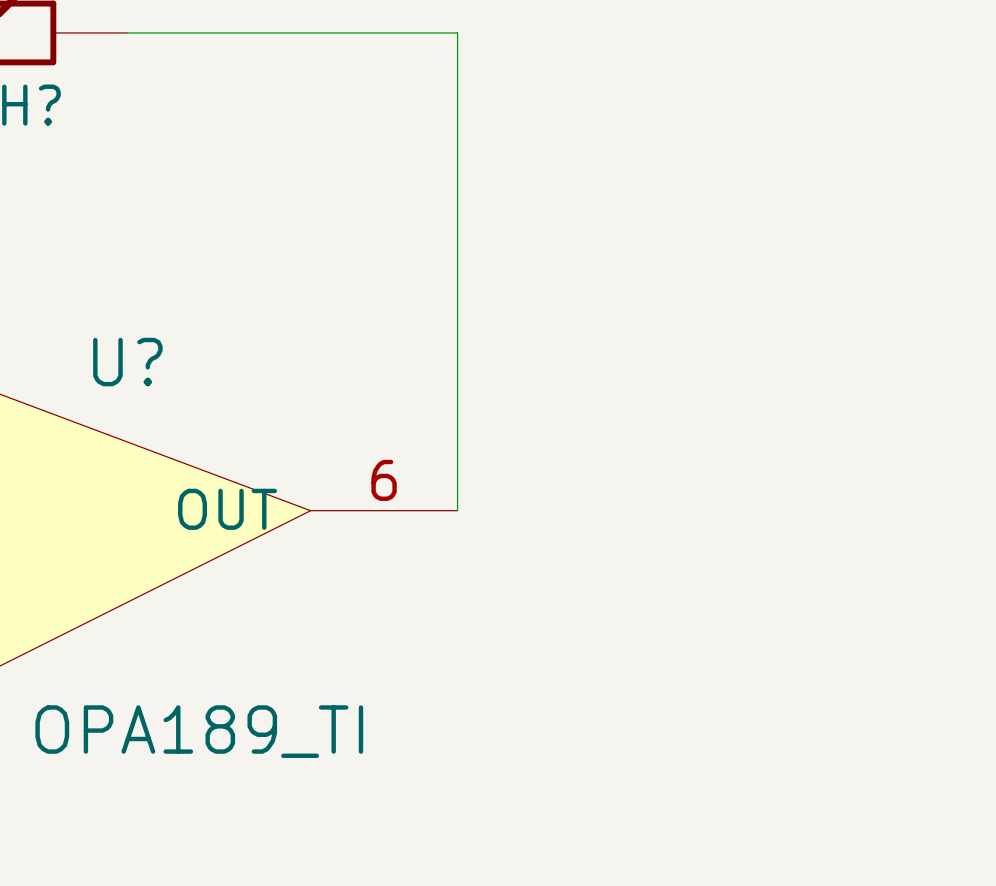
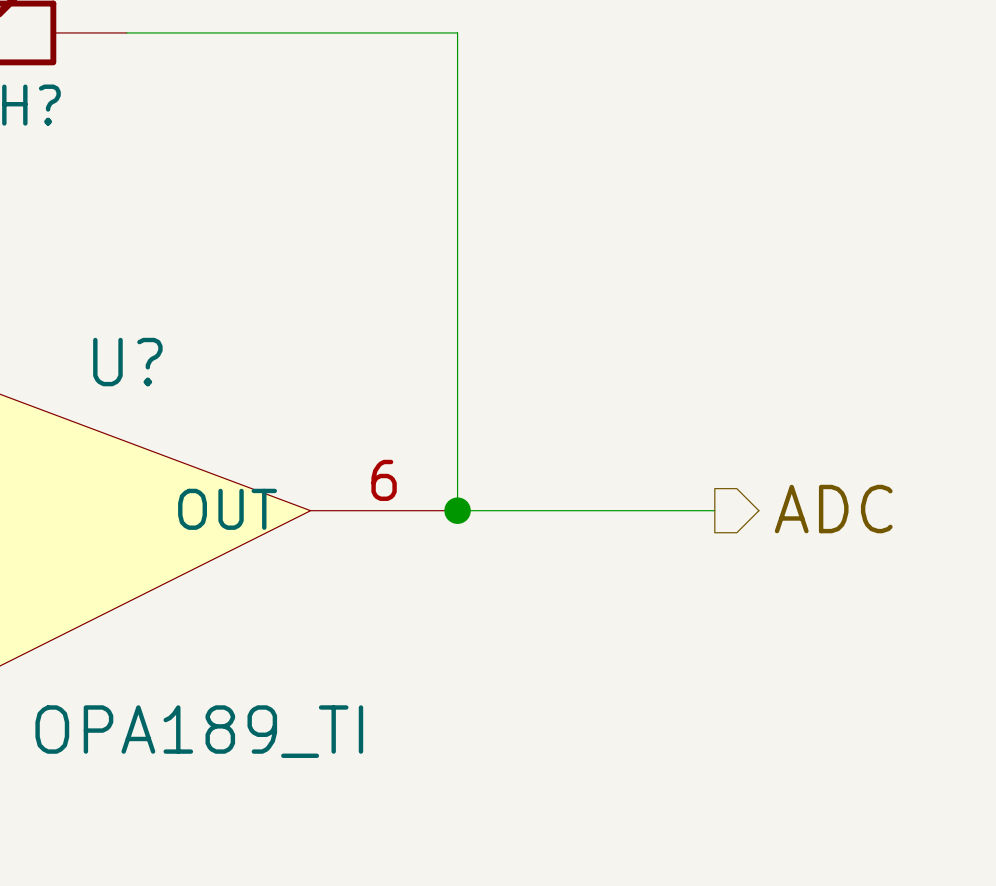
hierarchical label: none -> ADC (833, 509)
wire: none -> (457, 510) (714, 510)
junction: none -> (457, 510)

